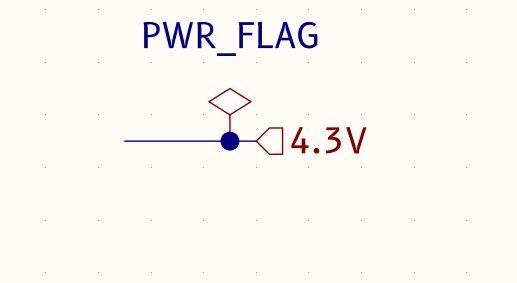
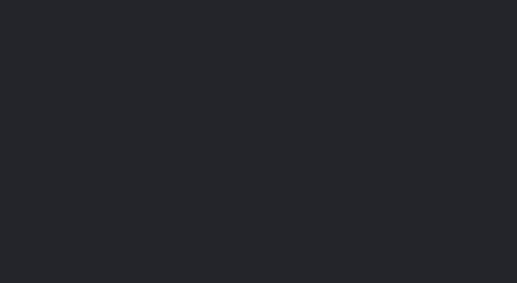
power symbol: PWR_FLAG (229, 114) -> none
hierarchical label: 4.3V (328, 140) -> none
wire: (124, 141) (256, 141) -> none
junction: (229, 141) -> none

